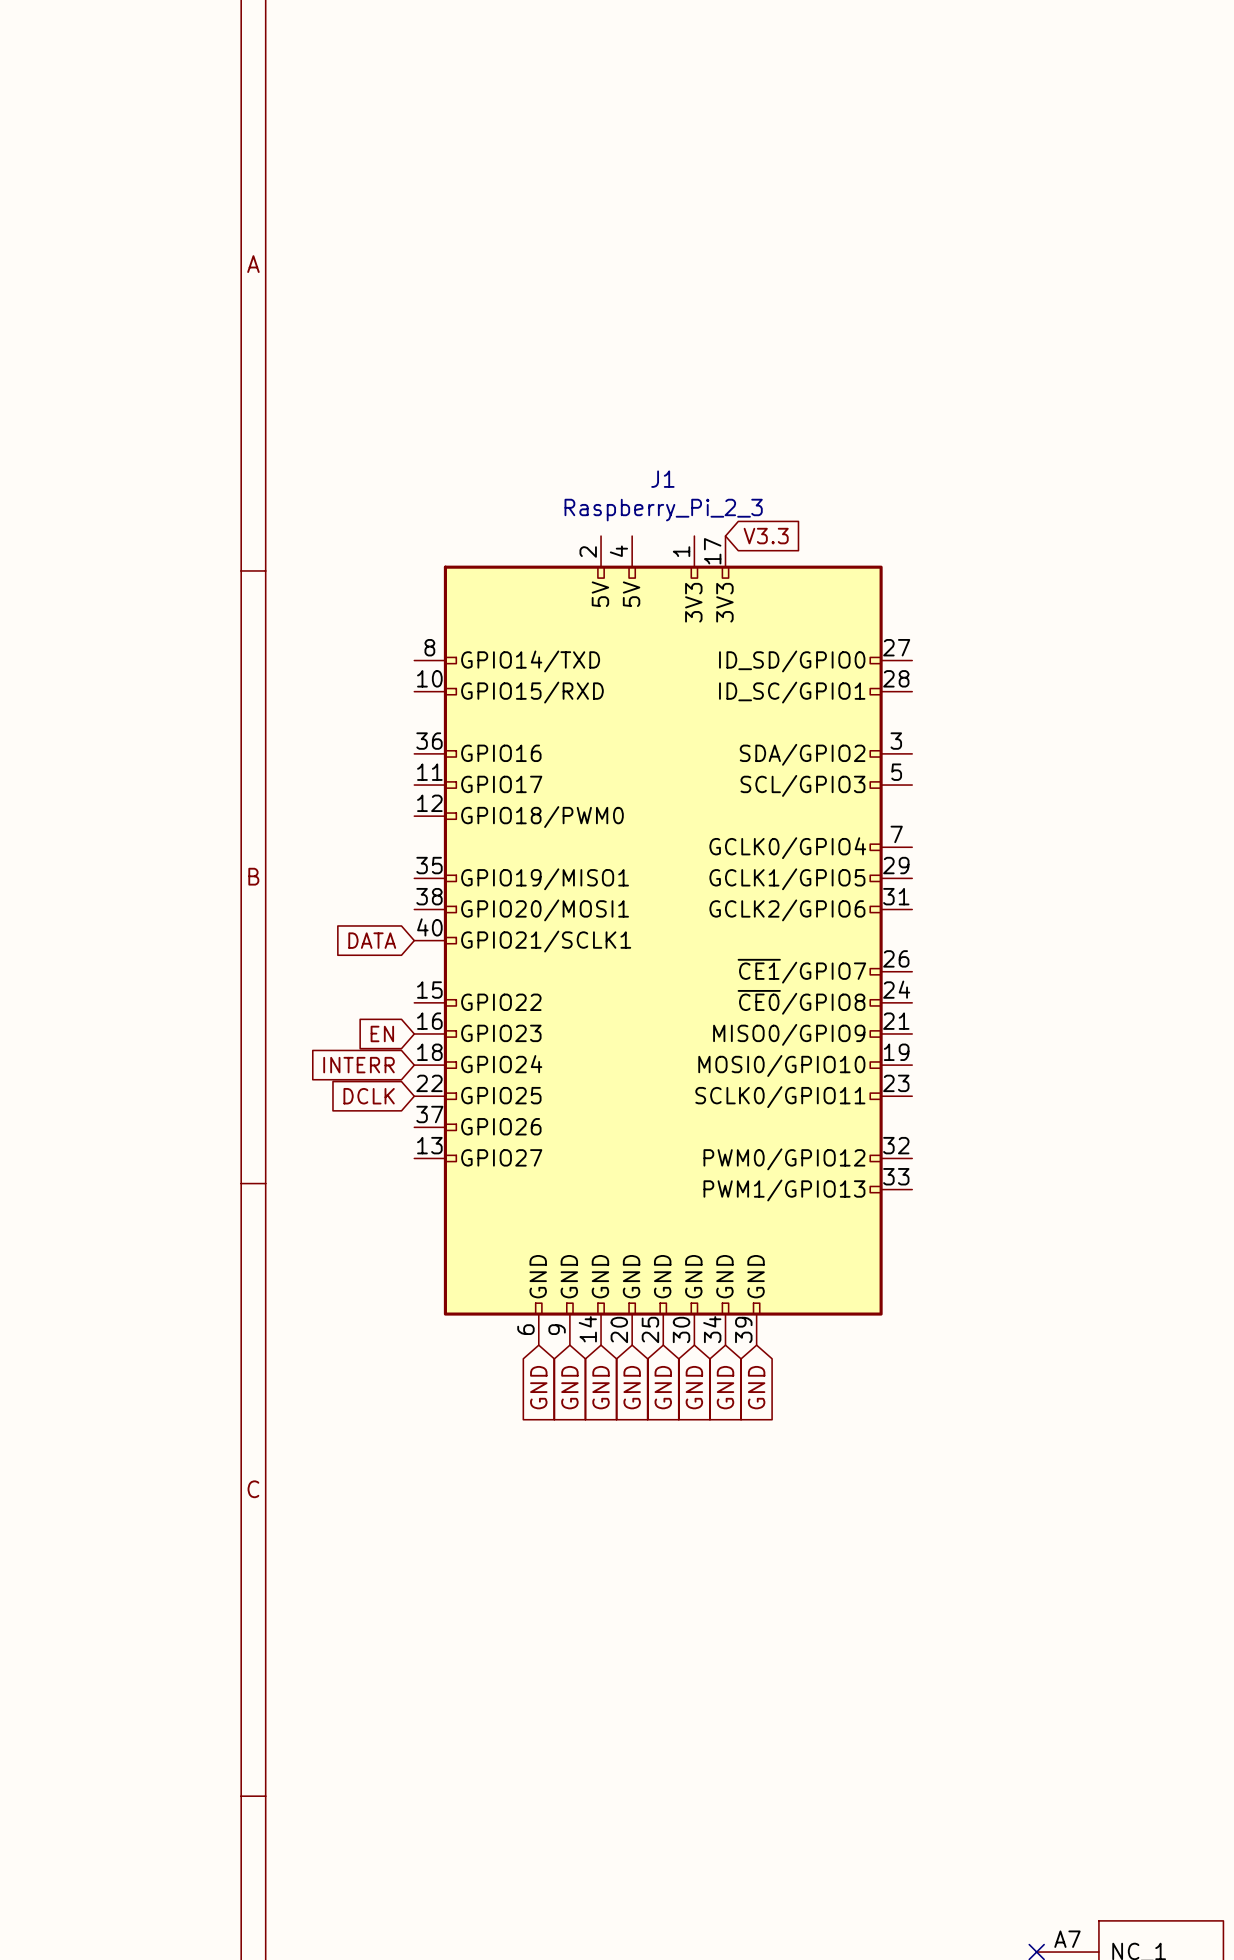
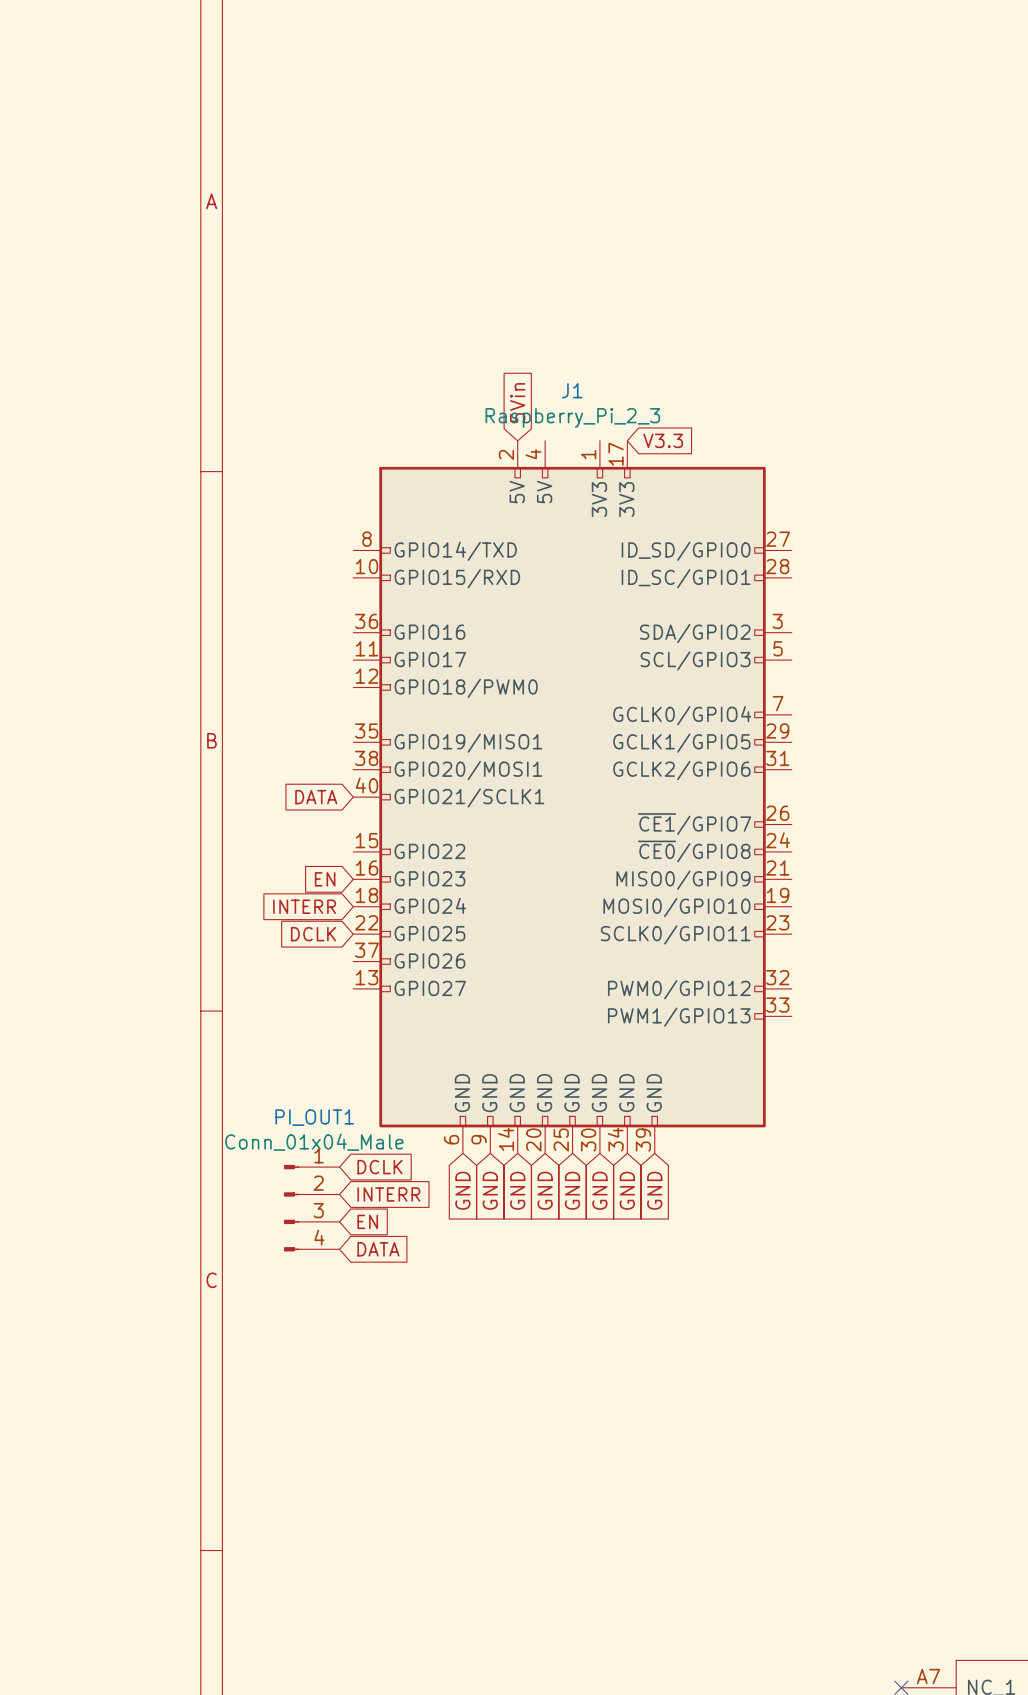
global label: none -> 5Vin (517, 402)
global label: none -> DCLK (380, 1167)
global label: none -> INTERR (388, 1194)
PI_OUT1: none -> Conn_01x04_Male (311, 1208)
global label: none -> EN (367, 1221)
global label: none -> DATA (378, 1249)

